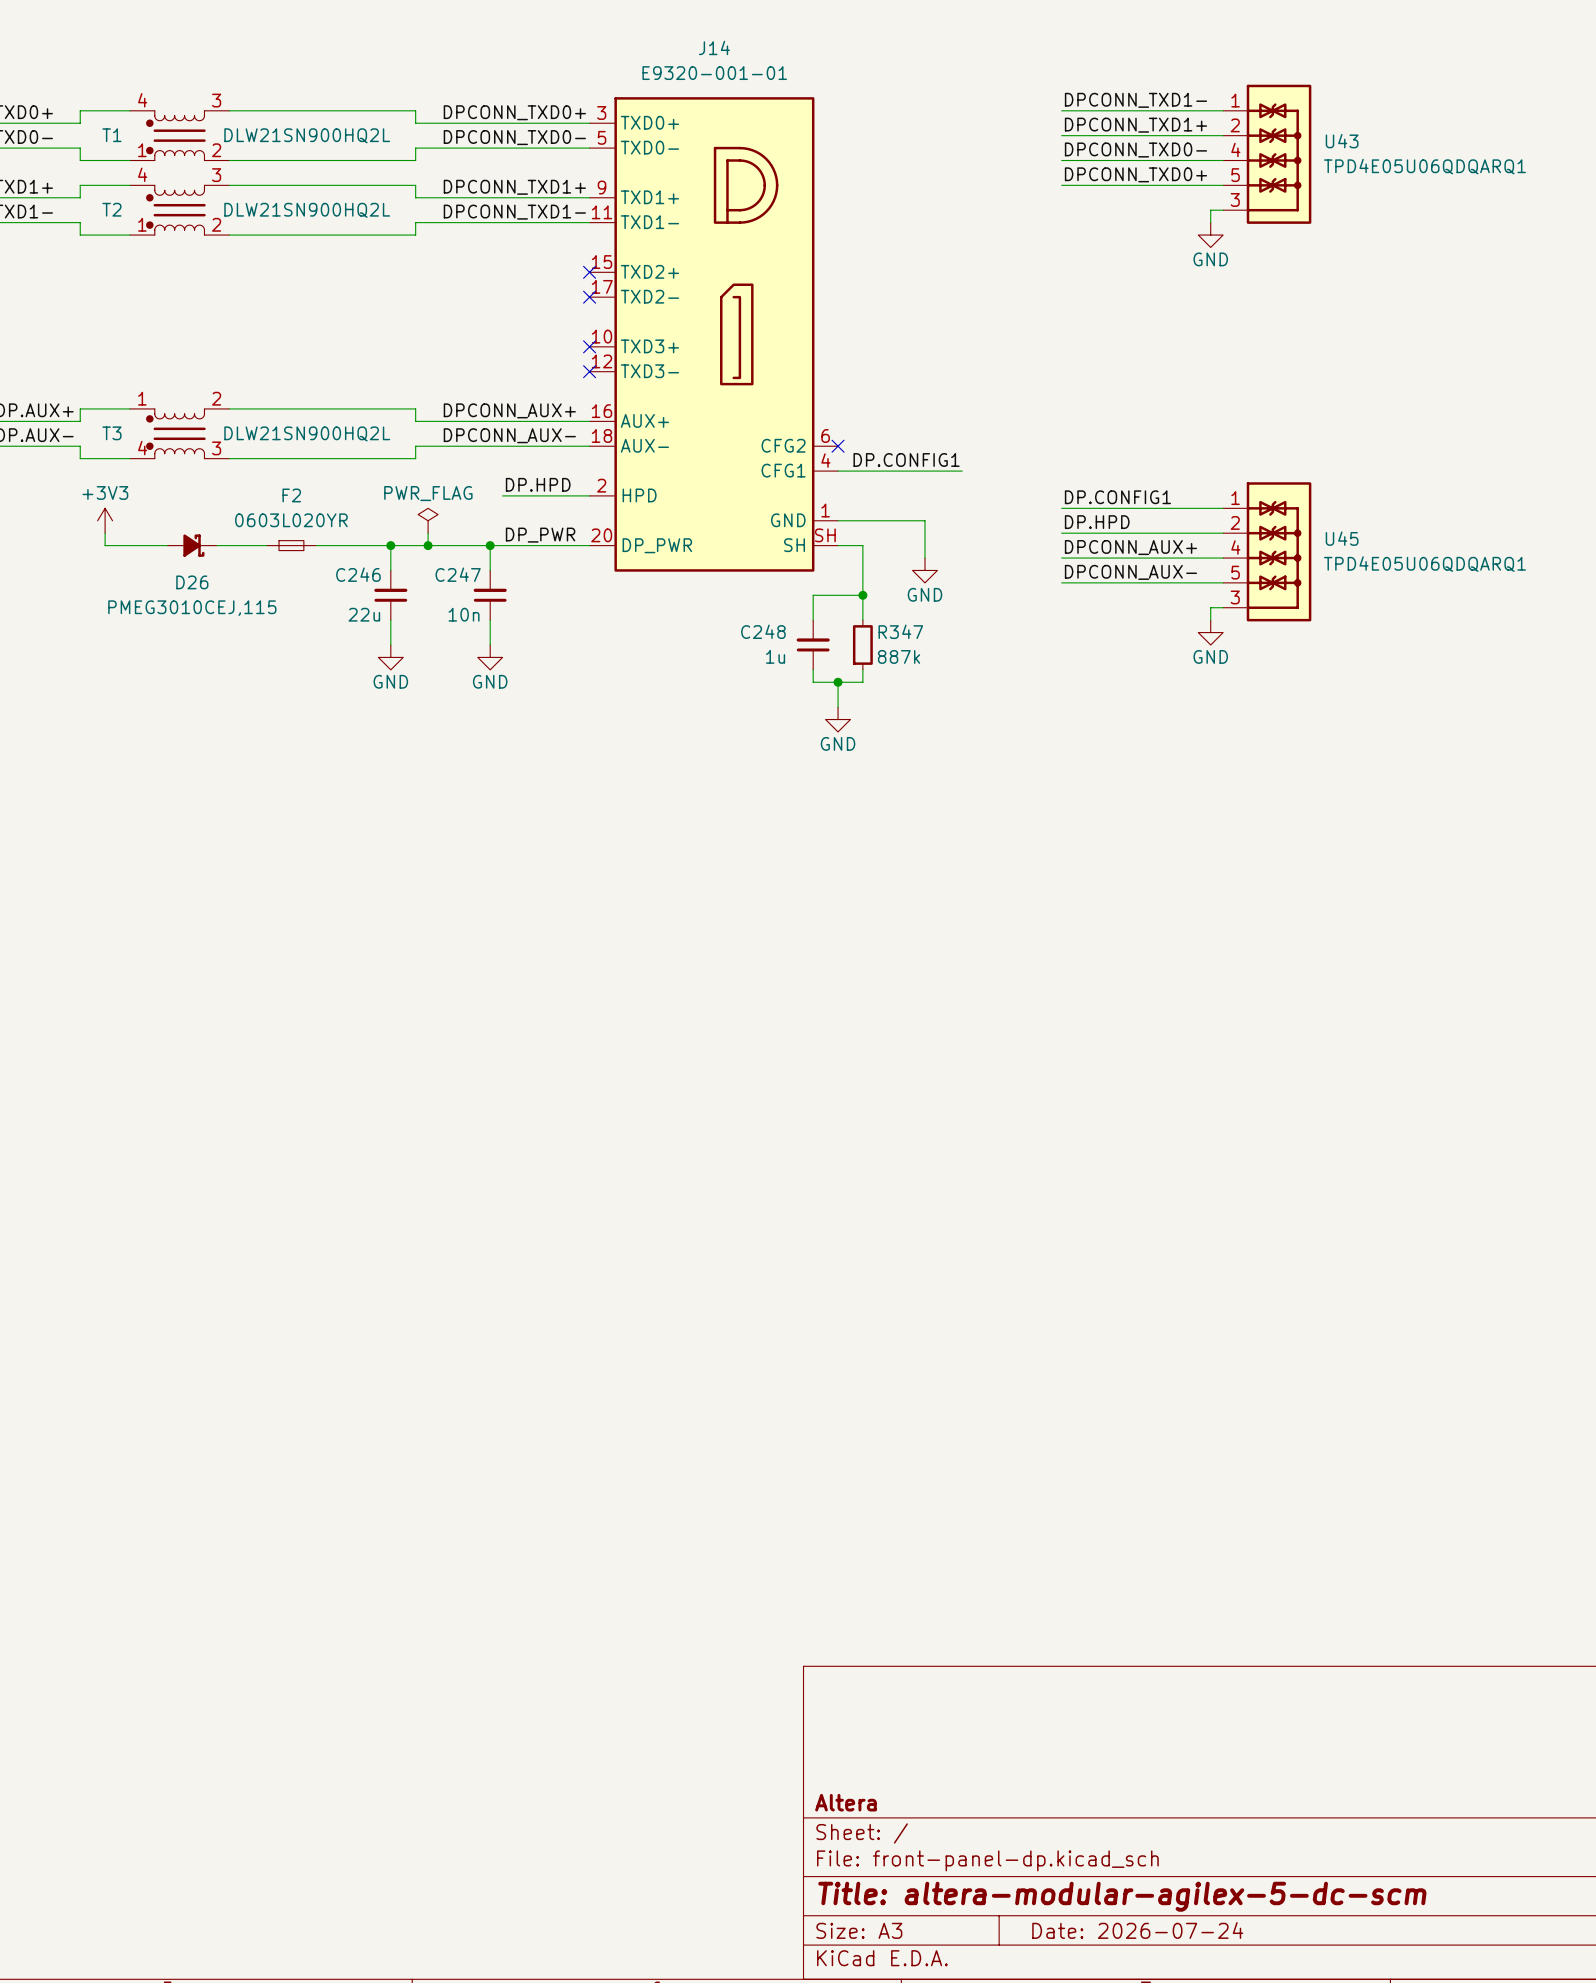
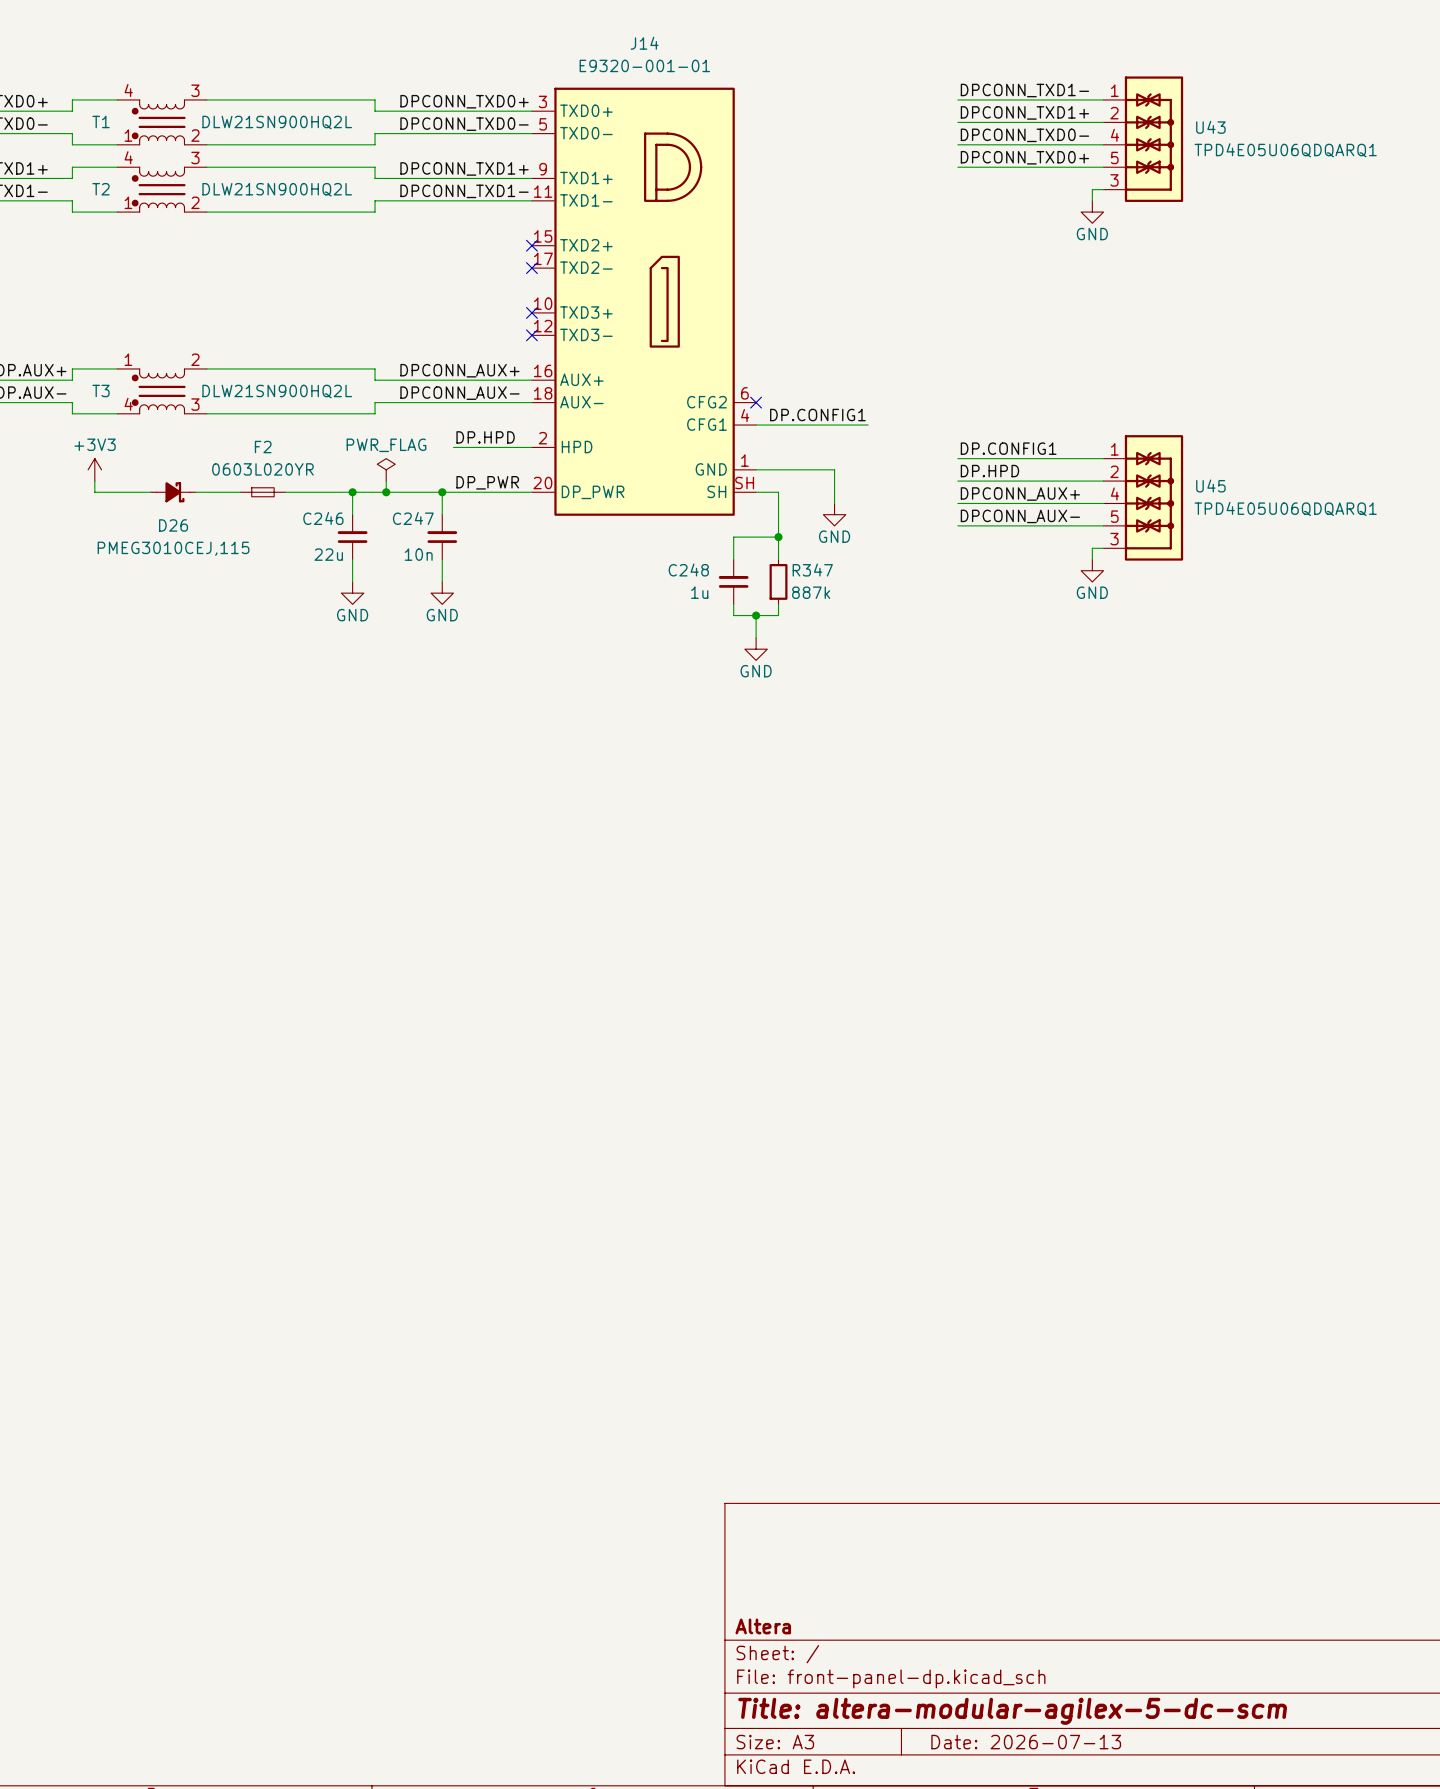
title block: Date: 2026-07-24 (1137, 1930) -> Date: 2026-07-13 (1026, 1742)

